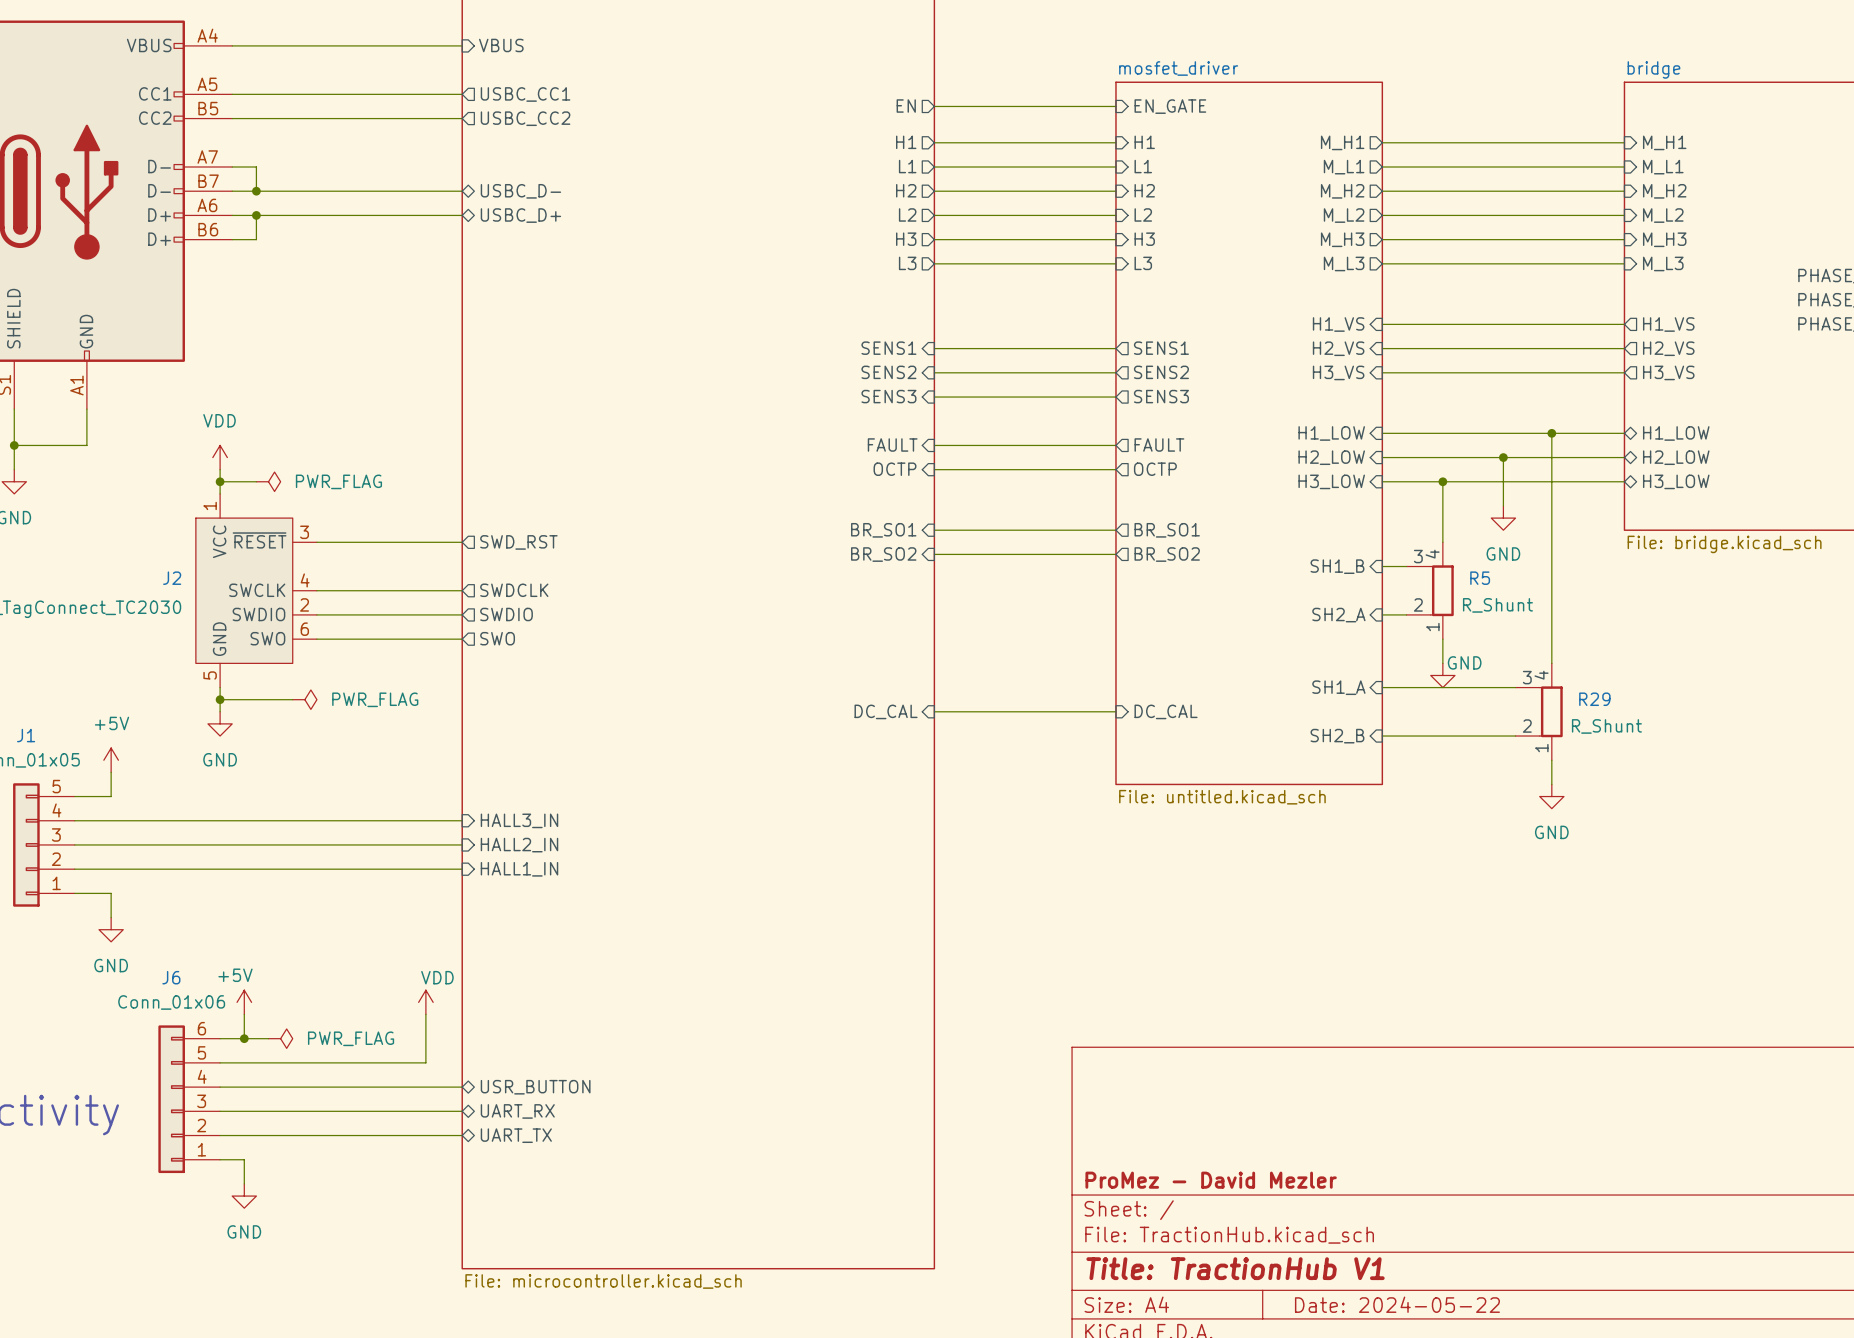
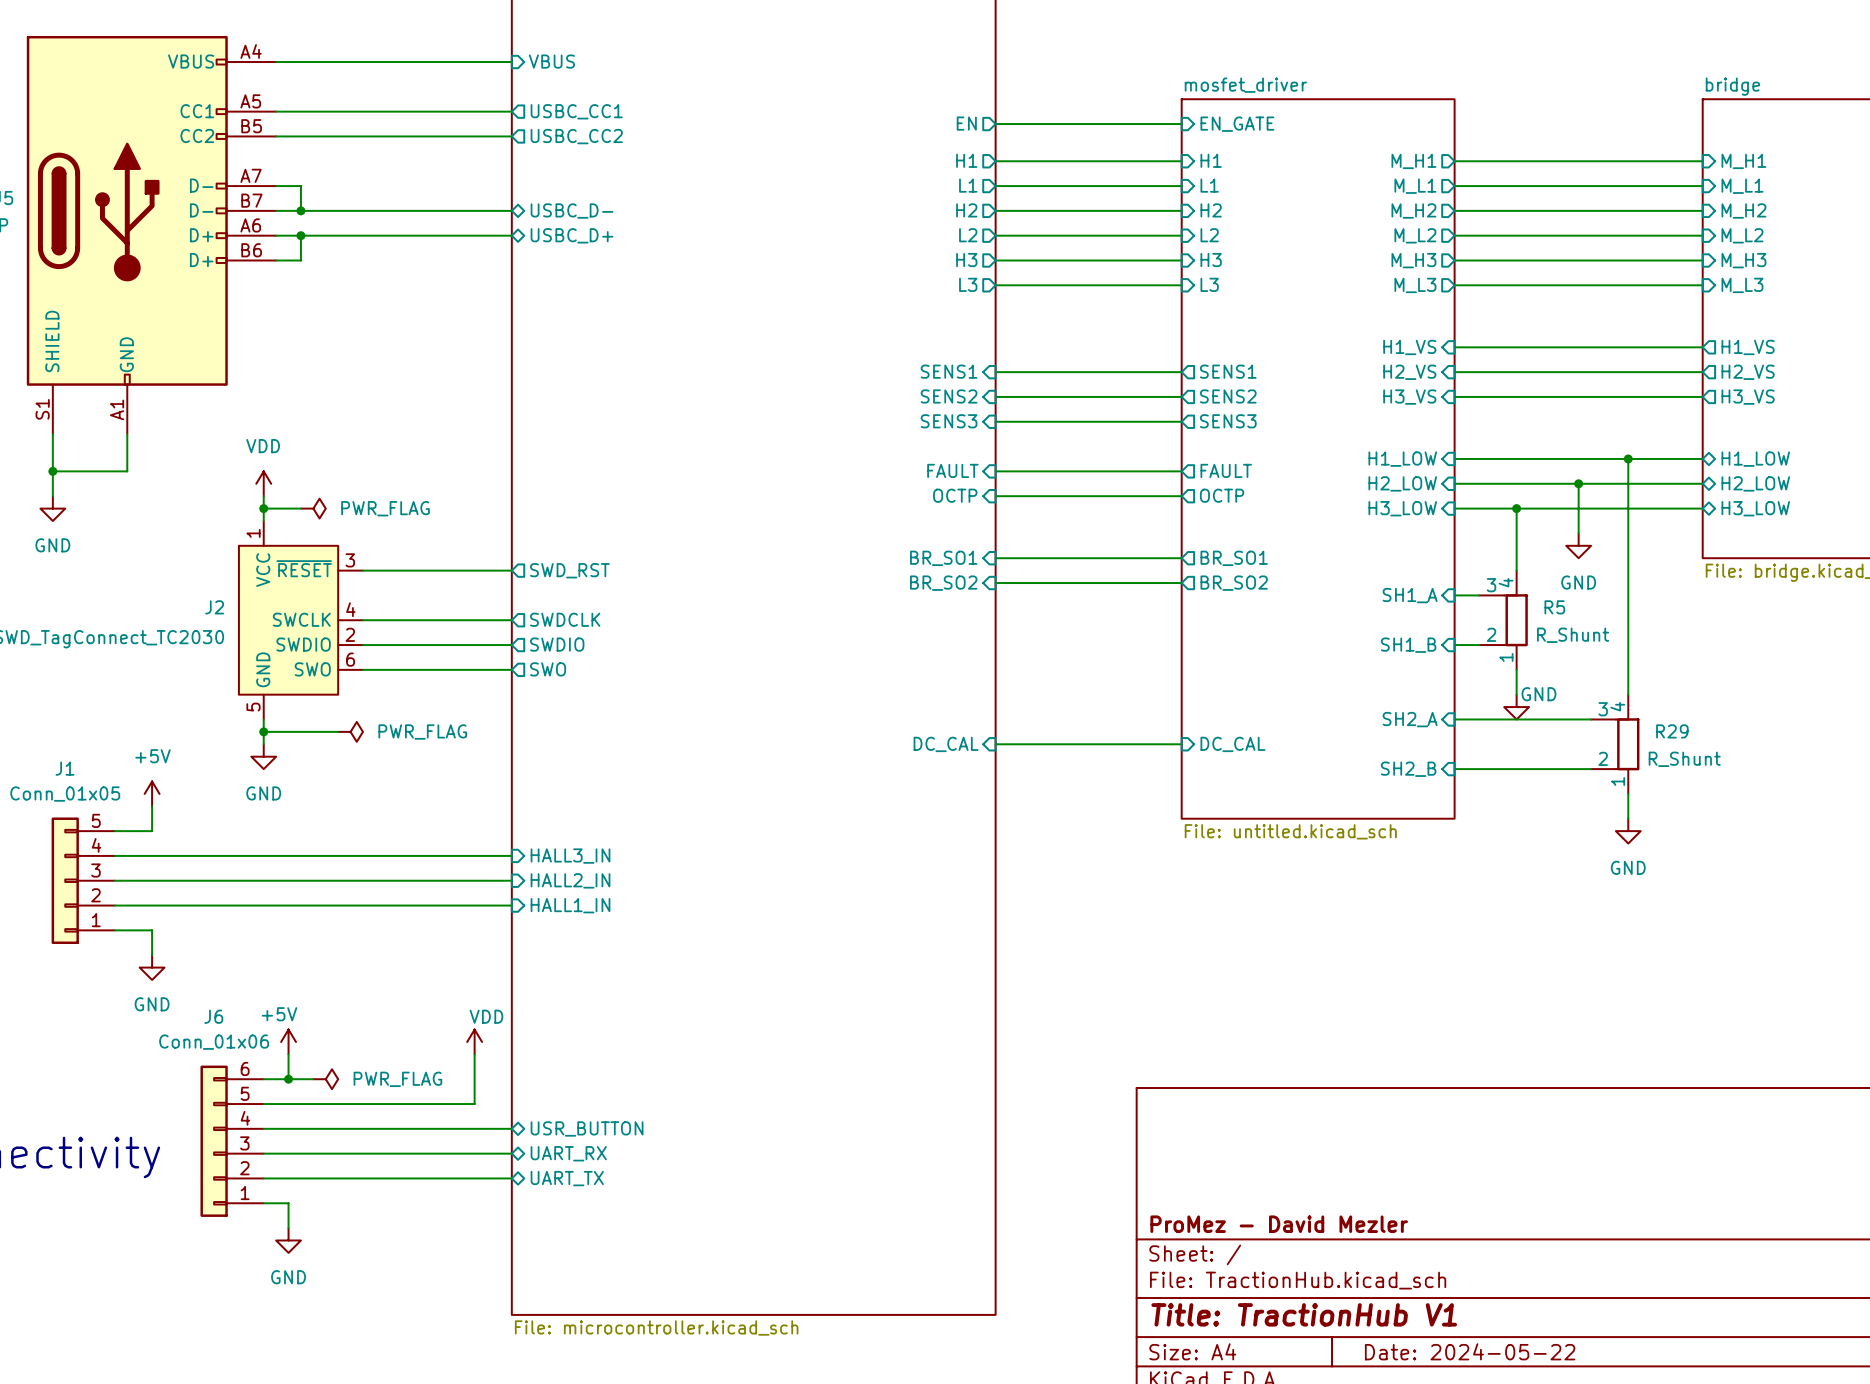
sheet pin: SH1_B (1337, 566) -> SH1_A (1410, 595)
sheet pin: SH2_A (1338, 615) -> SH1_B (1408, 645)
sheet pin: SH1_A (1338, 687) -> SH2_A (1410, 719)

